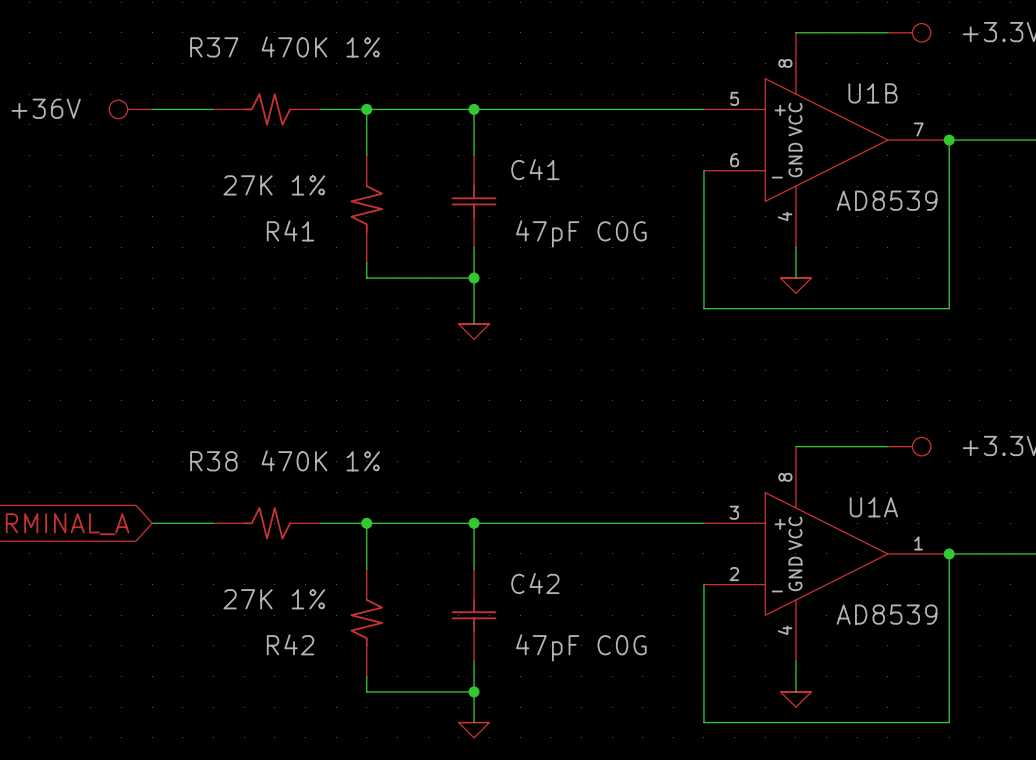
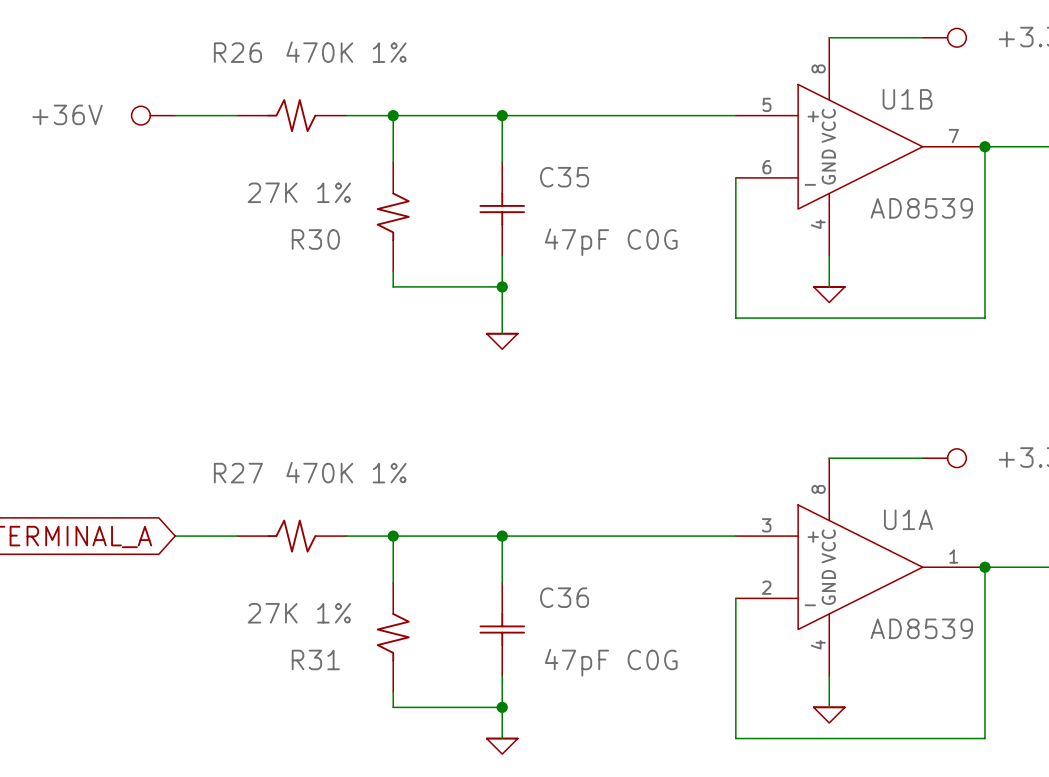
R37 name: R37 (214, 47) -> R26 (237, 52)
C41 name: C41 (535, 169) -> C35 (564, 177)
R41 name: R41 (290, 230) -> R30 (315, 239)
R38 name: R38 (213, 461) -> R27 (238, 473)
C42 name: C42 (535, 583) -> C36 (564, 597)
R42 name: R42 (290, 644) -> R31 (315, 659)

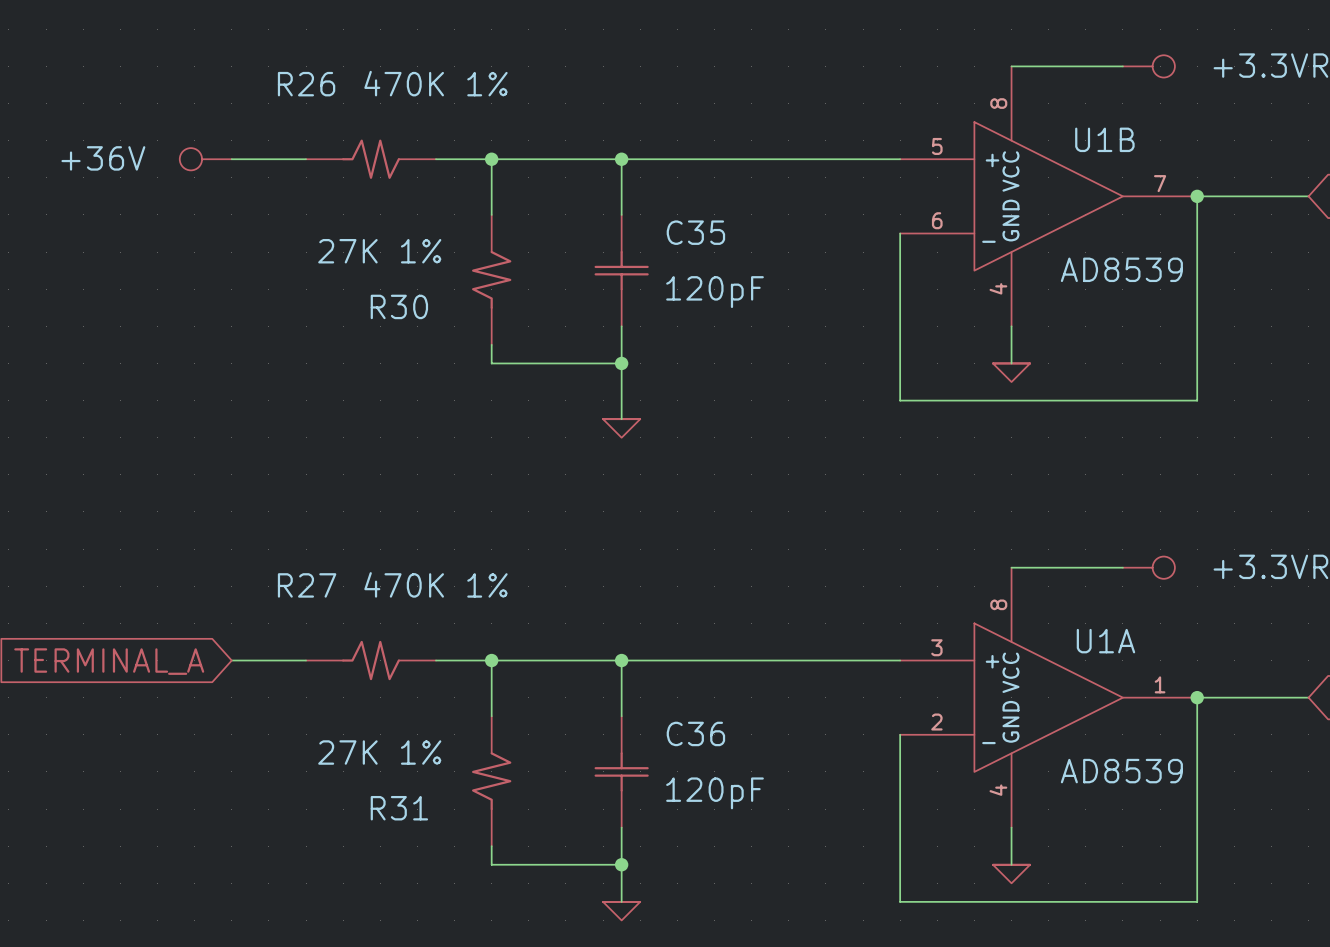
C35 value: 47pF C0G (611, 242) -> 120pF (715, 292)
C36 value: 47pF C0G (611, 662) -> 120pF (715, 793)

